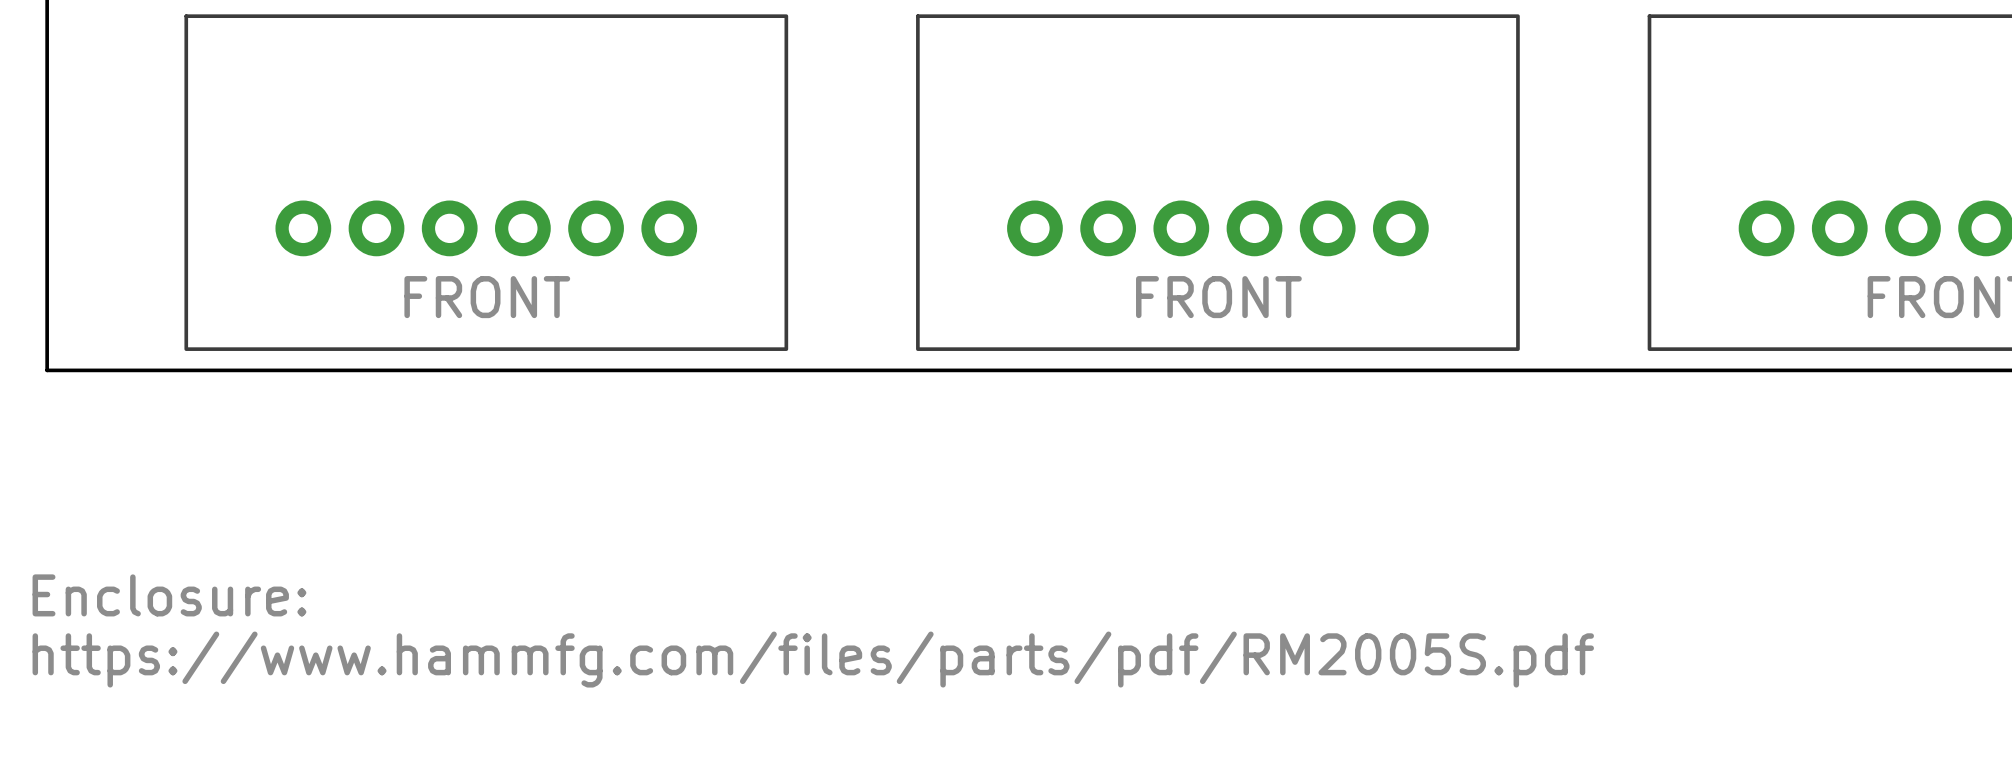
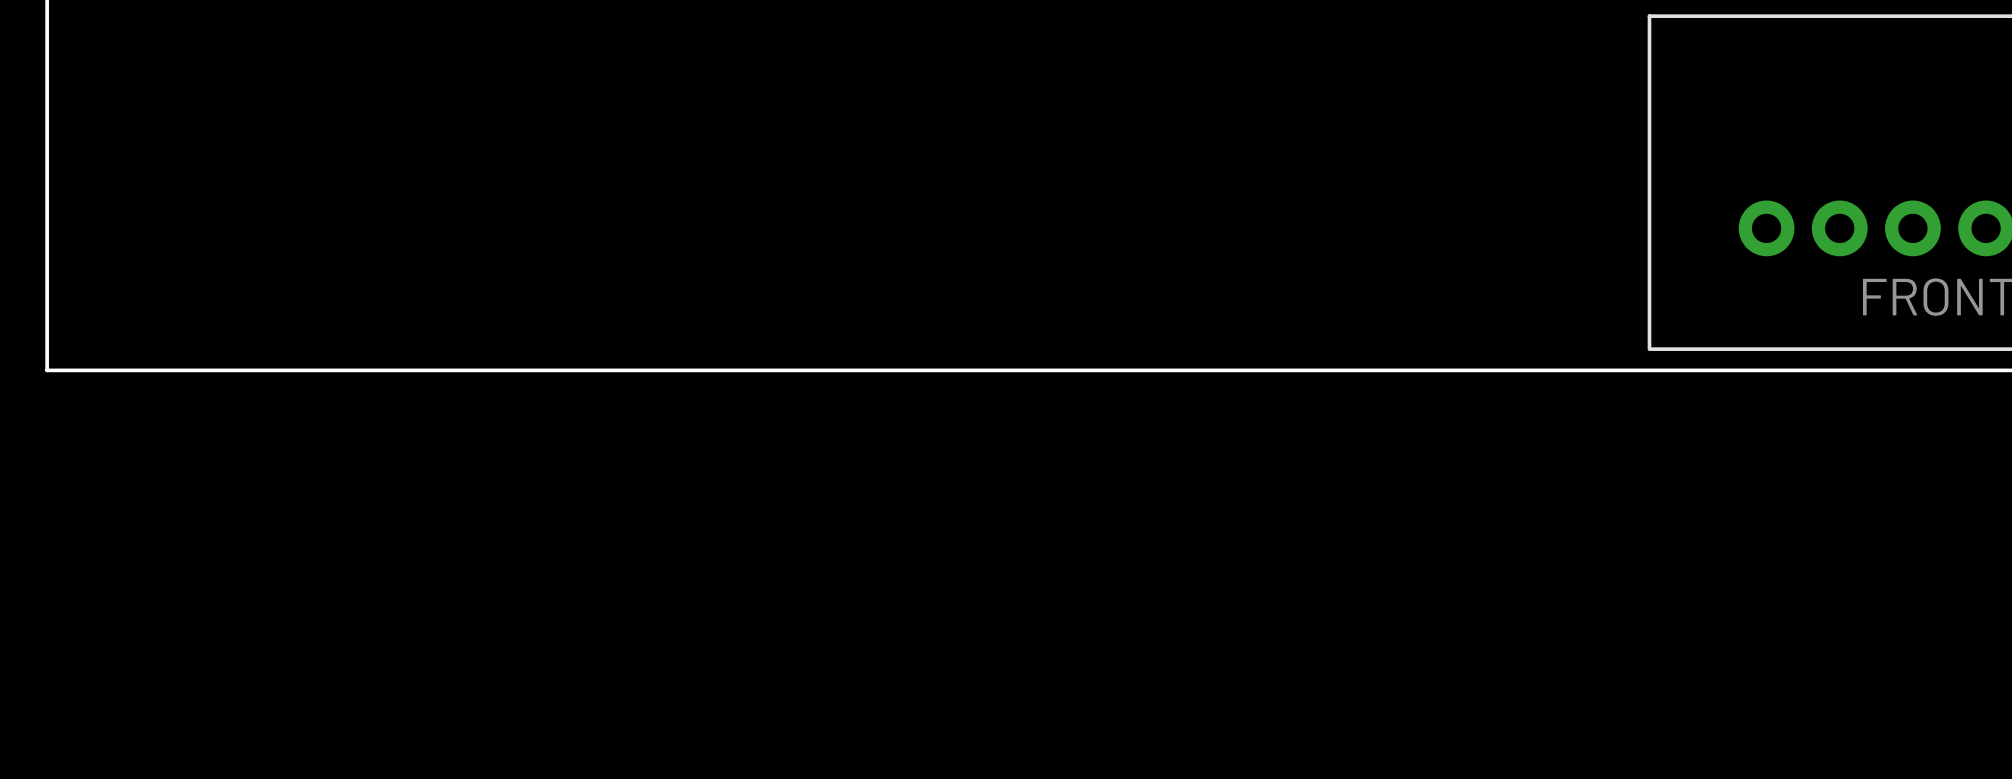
part: (486, 182) -> none
part: (1217, 182) -> none
text: Enclosure: (169, 595) -> none
text: https://www.hammfg.com/files/parts/pdf/RM2005S.pdf (813, 659) -> none

